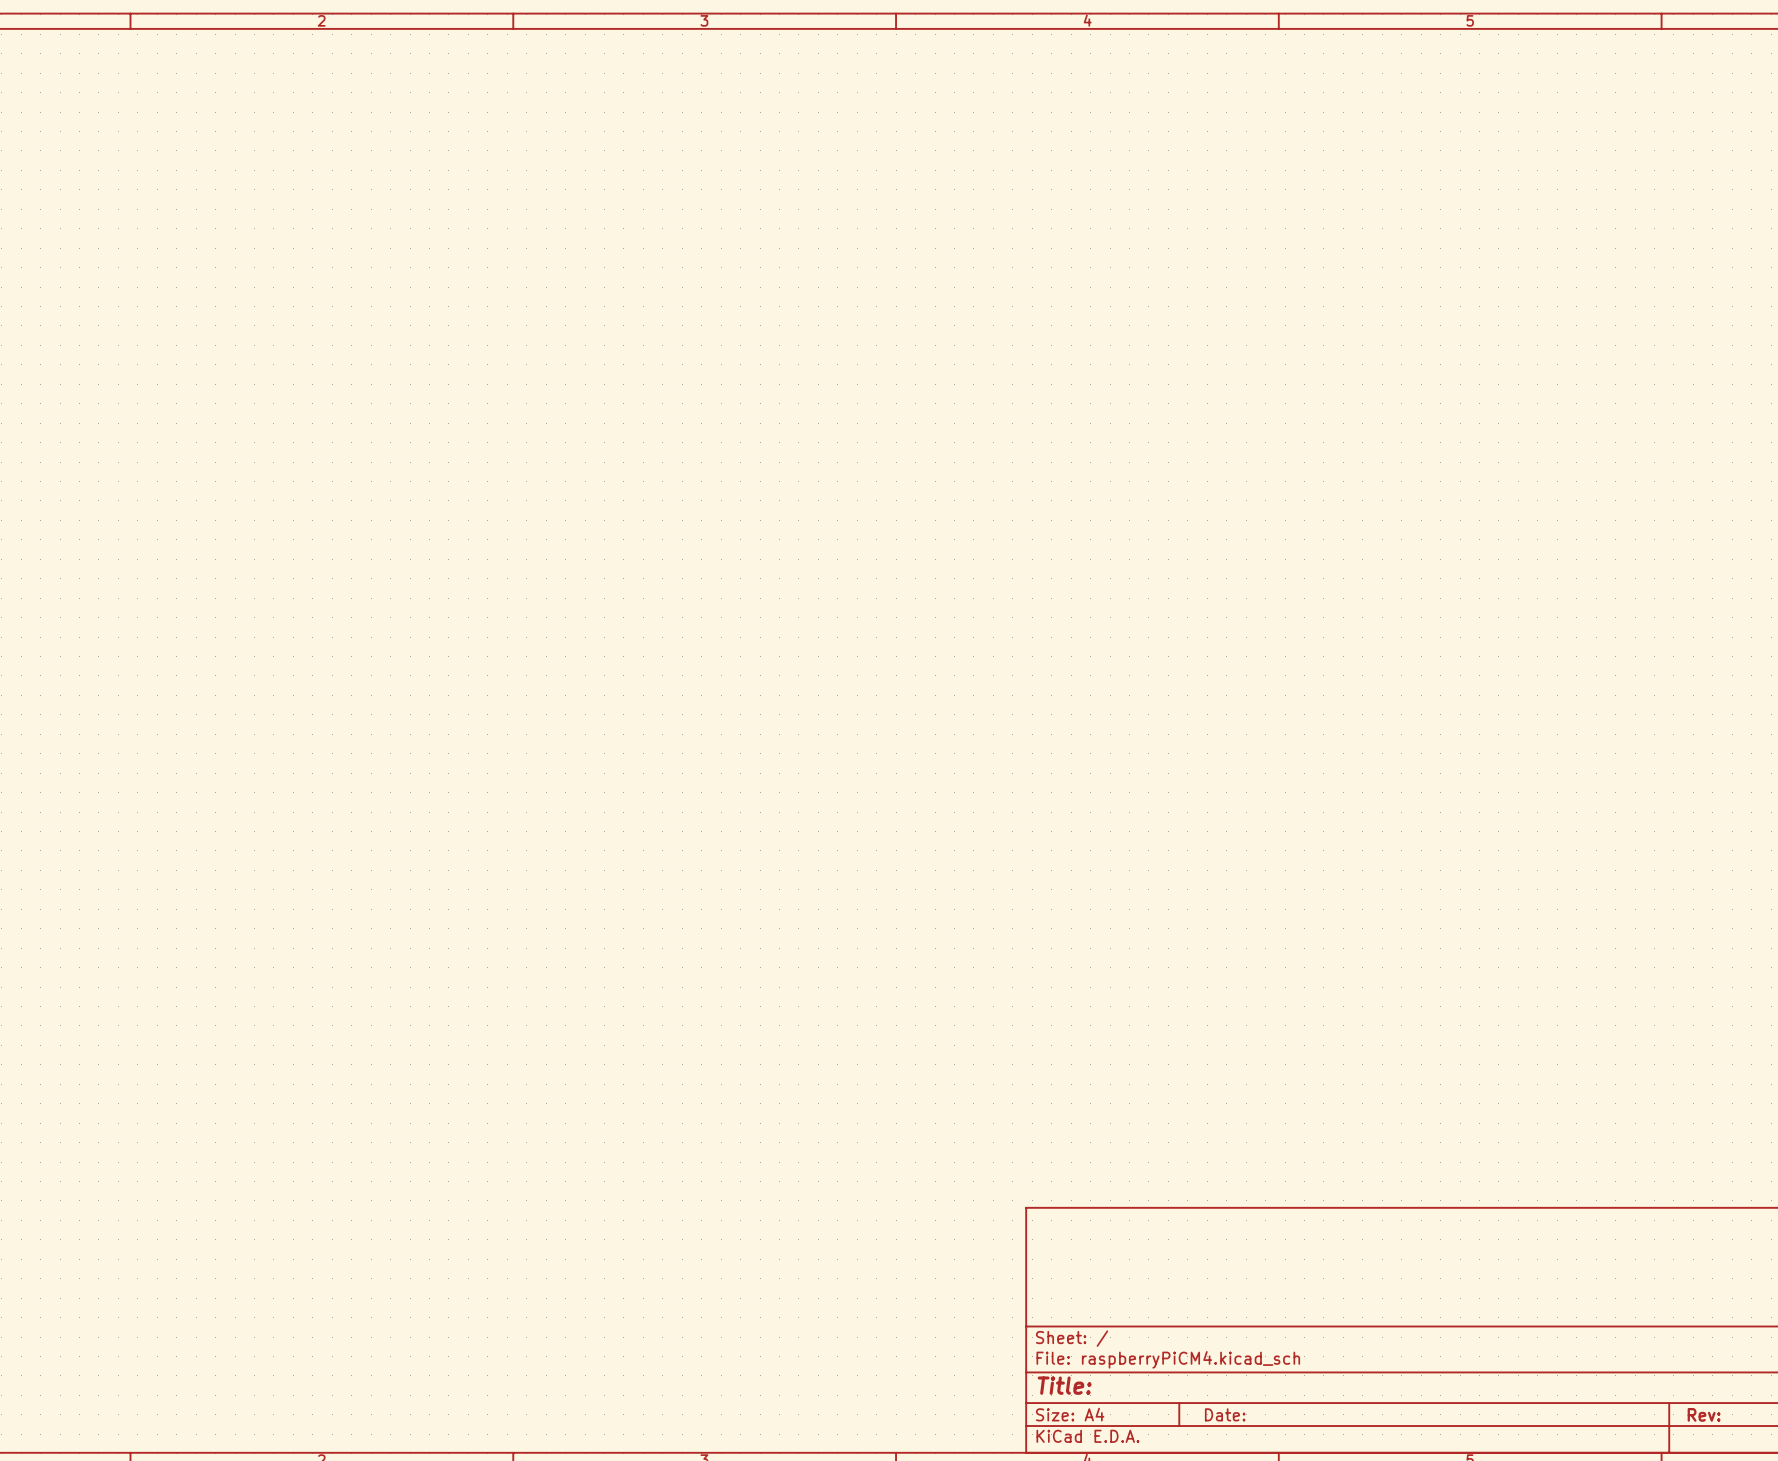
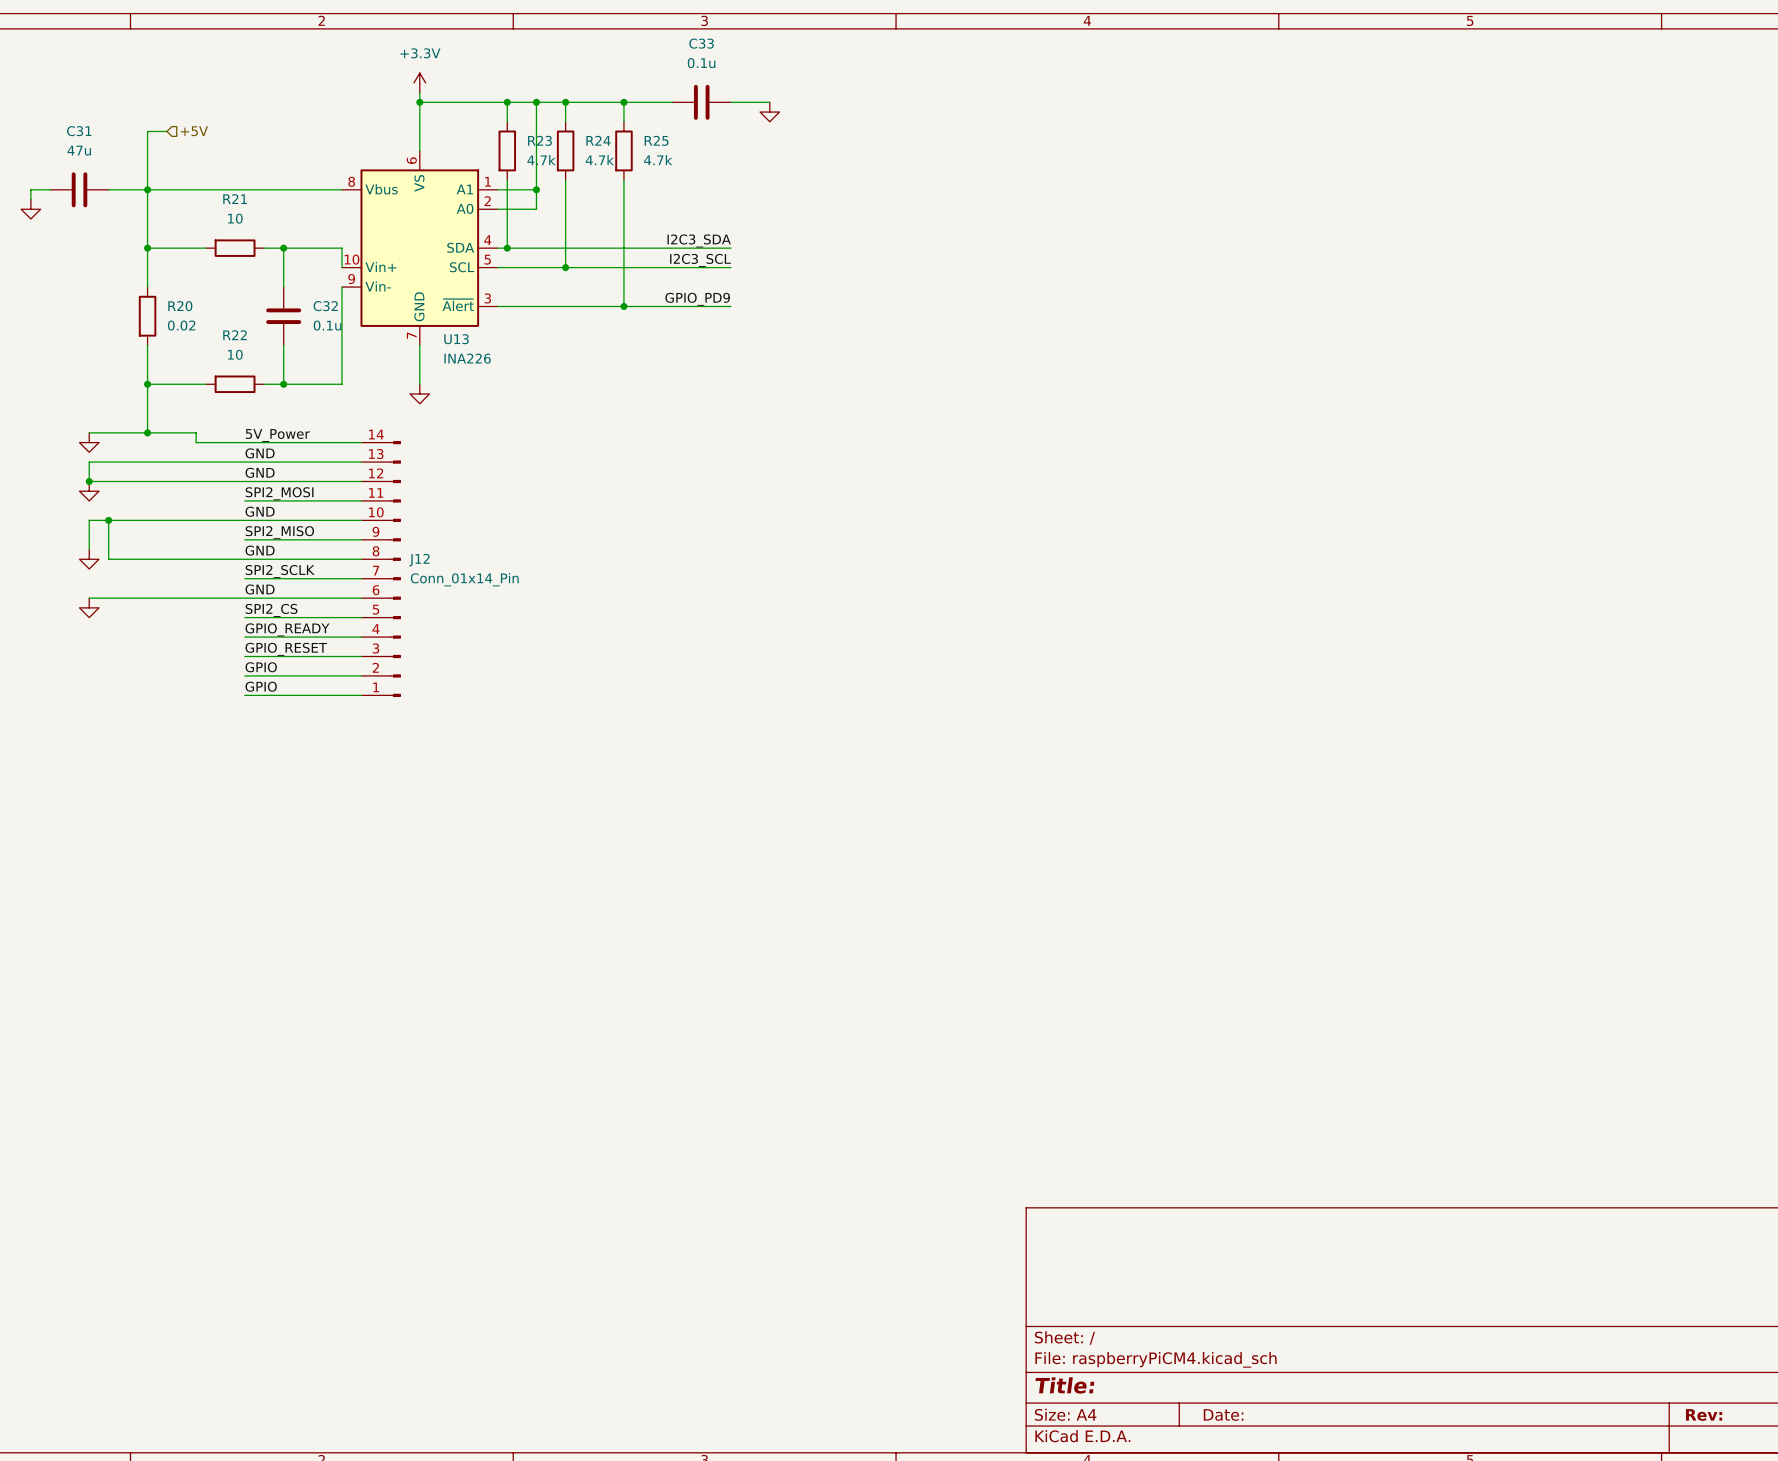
power symbol: none -> +3.3V (419, 82)
wire: none -> (419, 92) (419, 150)
wire: none -> (419, 102) (672, 102)
junction: none -> (419, 102)
wire: none -> (507, 102) (507, 121)
junction: none -> (507, 102)
wire: none -> (536, 102) (536, 209) (497, 209)
junction: none -> (536, 102)
wire: none -> (565, 102) (565, 121)
junction: none -> (565, 102)
wire: none -> (623, 102) (623, 121)
junction: none -> (623, 102)
C33: none -> 0.1u (701, 102)
wire: none -> (730, 102) (769, 102)
power symbol: none -> (769, 112)
wire: none -> (167, 131) (147, 131) (147, 287)
hierarchical label: none -> +5V (194, 131)
R23: none -> 4.7k (507, 150)
R24: none -> 4.7k (565, 150)
R25: none -> 4.7k (623, 150)
wire: none -> (507, 180) (507, 248)
wire: none -> (565, 180) (565, 267)
wire: none -> (623, 180) (623, 306)
wire: none -> (50, 189) (30, 189) (30, 199)
C31: none -> 47u (79, 189)
wire: none -> (108, 189) (342, 189)
junction: none -> (147, 189)
wire: none -> (497, 189) (536, 189)
junction: none -> (536, 189)
power symbol: none -> (30, 209)
label: none -> I2C3_SDA (699, 240)
wire: none -> (147, 248) (205, 248)
junction: none -> (147, 248)
R21: none -> 10 (235, 248)
wire: none -> (264, 248) (342, 248) (342, 267)
wire: none -> (283, 248) (283, 287)
junction: none -> (283, 248)
U13: none -> INA226 (419, 248)
wire: none -> (497, 248) (730, 248)
junction: none -> (507, 248)
label: none -> I2C3_SCL (700, 260)
wire: none -> (497, 267) (730, 267)
junction: none -> (565, 267)
wire: none -> (342, 287) (342, 384) (264, 384)
label: none -> GPIO_PD9 (697, 299)
wire: none -> (497, 306) (730, 306)
junction: none -> (623, 306)
R20: none -> 0.02 (147, 316)
C32: none -> 0.1u (283, 316)
wire: none -> (147, 345) (147, 432)
wire: none -> (283, 345) (283, 384)
wire: none -> (419, 345) (419, 384)
wire: none -> (147, 384) (205, 384)
junction: none -> (147, 384)
R22: none -> 10 (235, 384)
junction: none -> (283, 384)
power symbol: none -> (419, 393)
wire: none -> (89, 432) (196, 432) (196, 442) (361, 442)
junction: none -> (147, 432)
label: none -> 5V_Power (277, 435)
power symbol: none -> (89, 442)
label: none -> GND (260, 453)
wire: none -> (361, 462) (89, 462) (89, 481) (361, 481)
label: none -> GND (260, 472)
junction: none -> (89, 481)
power symbol: none -> (89, 491)
label: none -> SPI2_MOSI (279, 493)
wire: none -> (244, 500) (361, 500)
label: none -> GND (260, 511)
wire: none -> (108, 520) (108, 559) (361, 559)
junction: none -> (108, 520)
wire: none -> (361, 520) (89, 520) (89, 549)
label: none -> SPI2_MISO (279, 532)
wire: none -> (244, 539) (361, 539)
label: none -> GND (260, 550)
power symbol: none -> (89, 559)
J12: none -> Conn_01x14_Pin (381, 568)
label: none -> SPI2_SCLK (280, 571)
wire: none -> (244, 578) (361, 578)
label: none -> GND (260, 589)
wire: none -> (89, 598) (361, 598)
power symbol: none -> (89, 607)
label: none -> SPI2_CS (271, 610)
wire: none -> (244, 617) (361, 617)
label: none -> GPIO_READY (287, 629)
wire: none -> (244, 637) (361, 637)
label: none -> GPIO_RESET (286, 649)
wire: none -> (244, 656) (361, 656)
label: none -> GPIO (261, 667)
wire: none -> (244, 675) (361, 675)
label: none -> GPIO (261, 686)
wire: none -> (244, 695) (361, 695)

